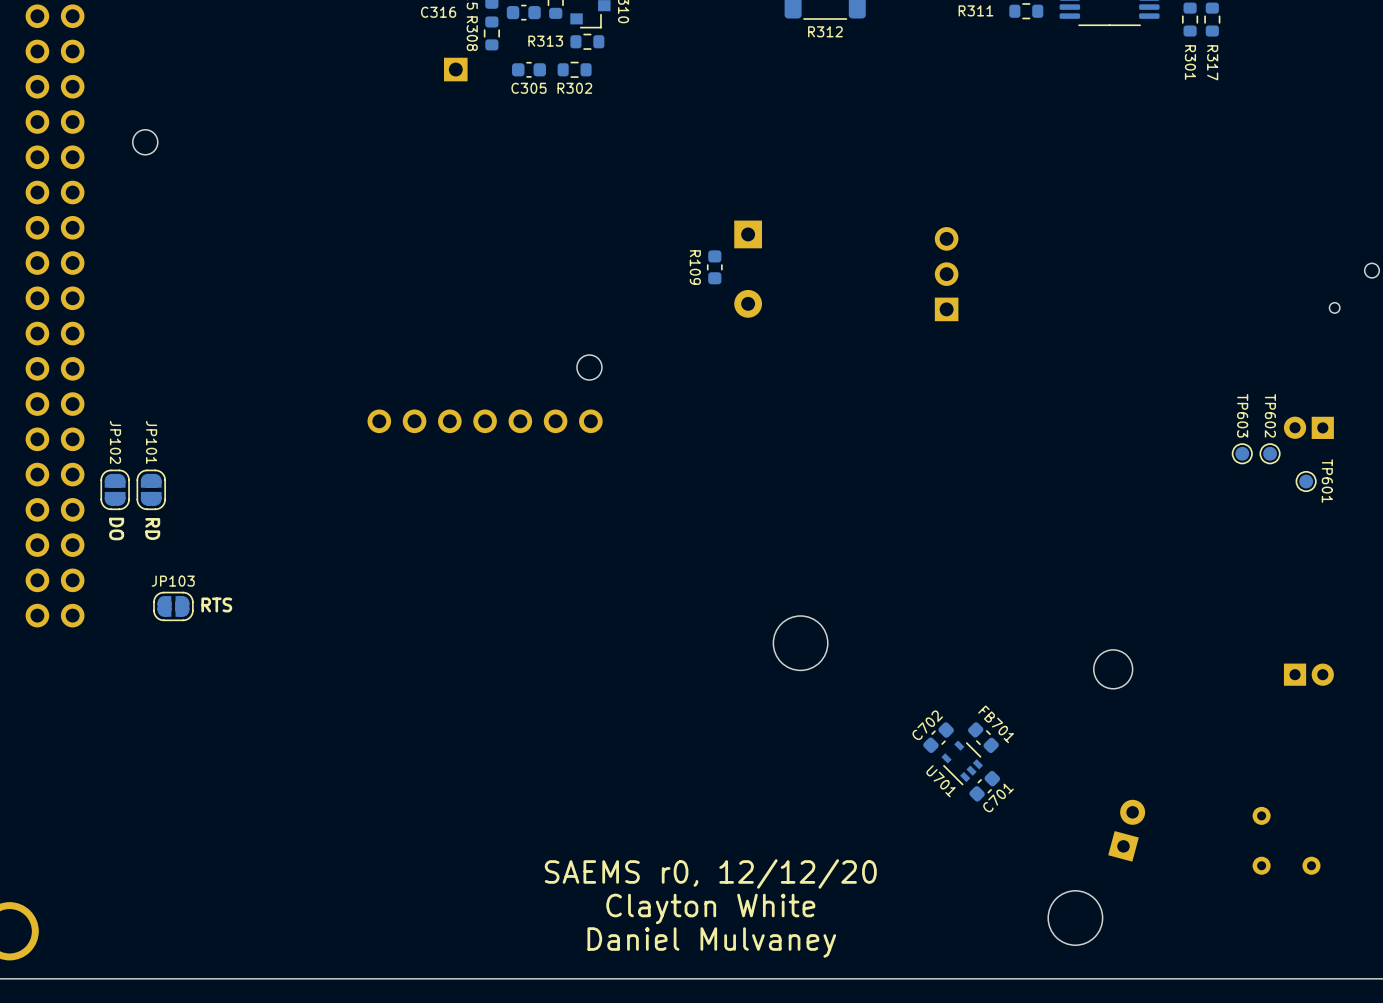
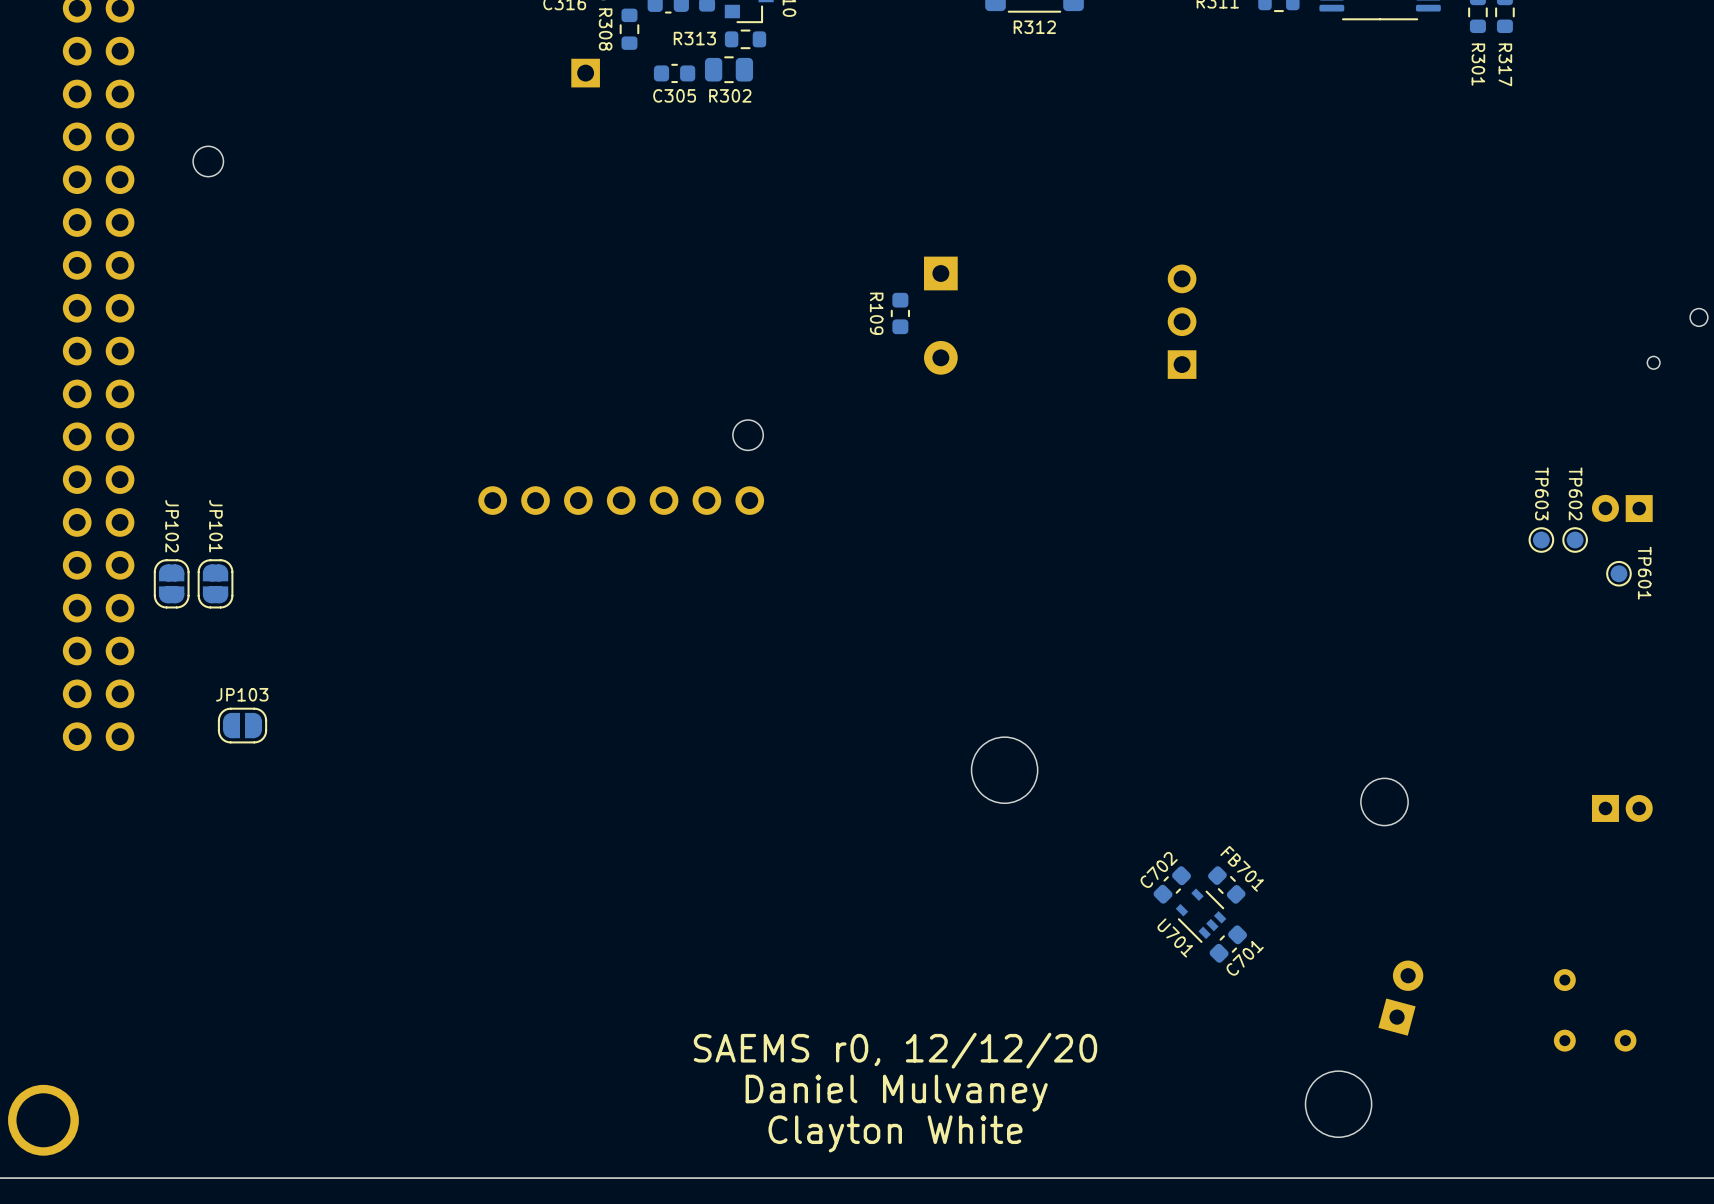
R302 footprint: [557, 61, 592, 78] -> [704, 56, 754, 84]
text: DO (116, 529) -> none
text: RD (152, 529) -> none
text: RTS (216, 604) -> none
text: Clayton White (710, 908) -> Daniel Mulvaney (896, 1093)
text: Daniel Mulvaney (711, 942) -> Clayton White (895, 1133)

